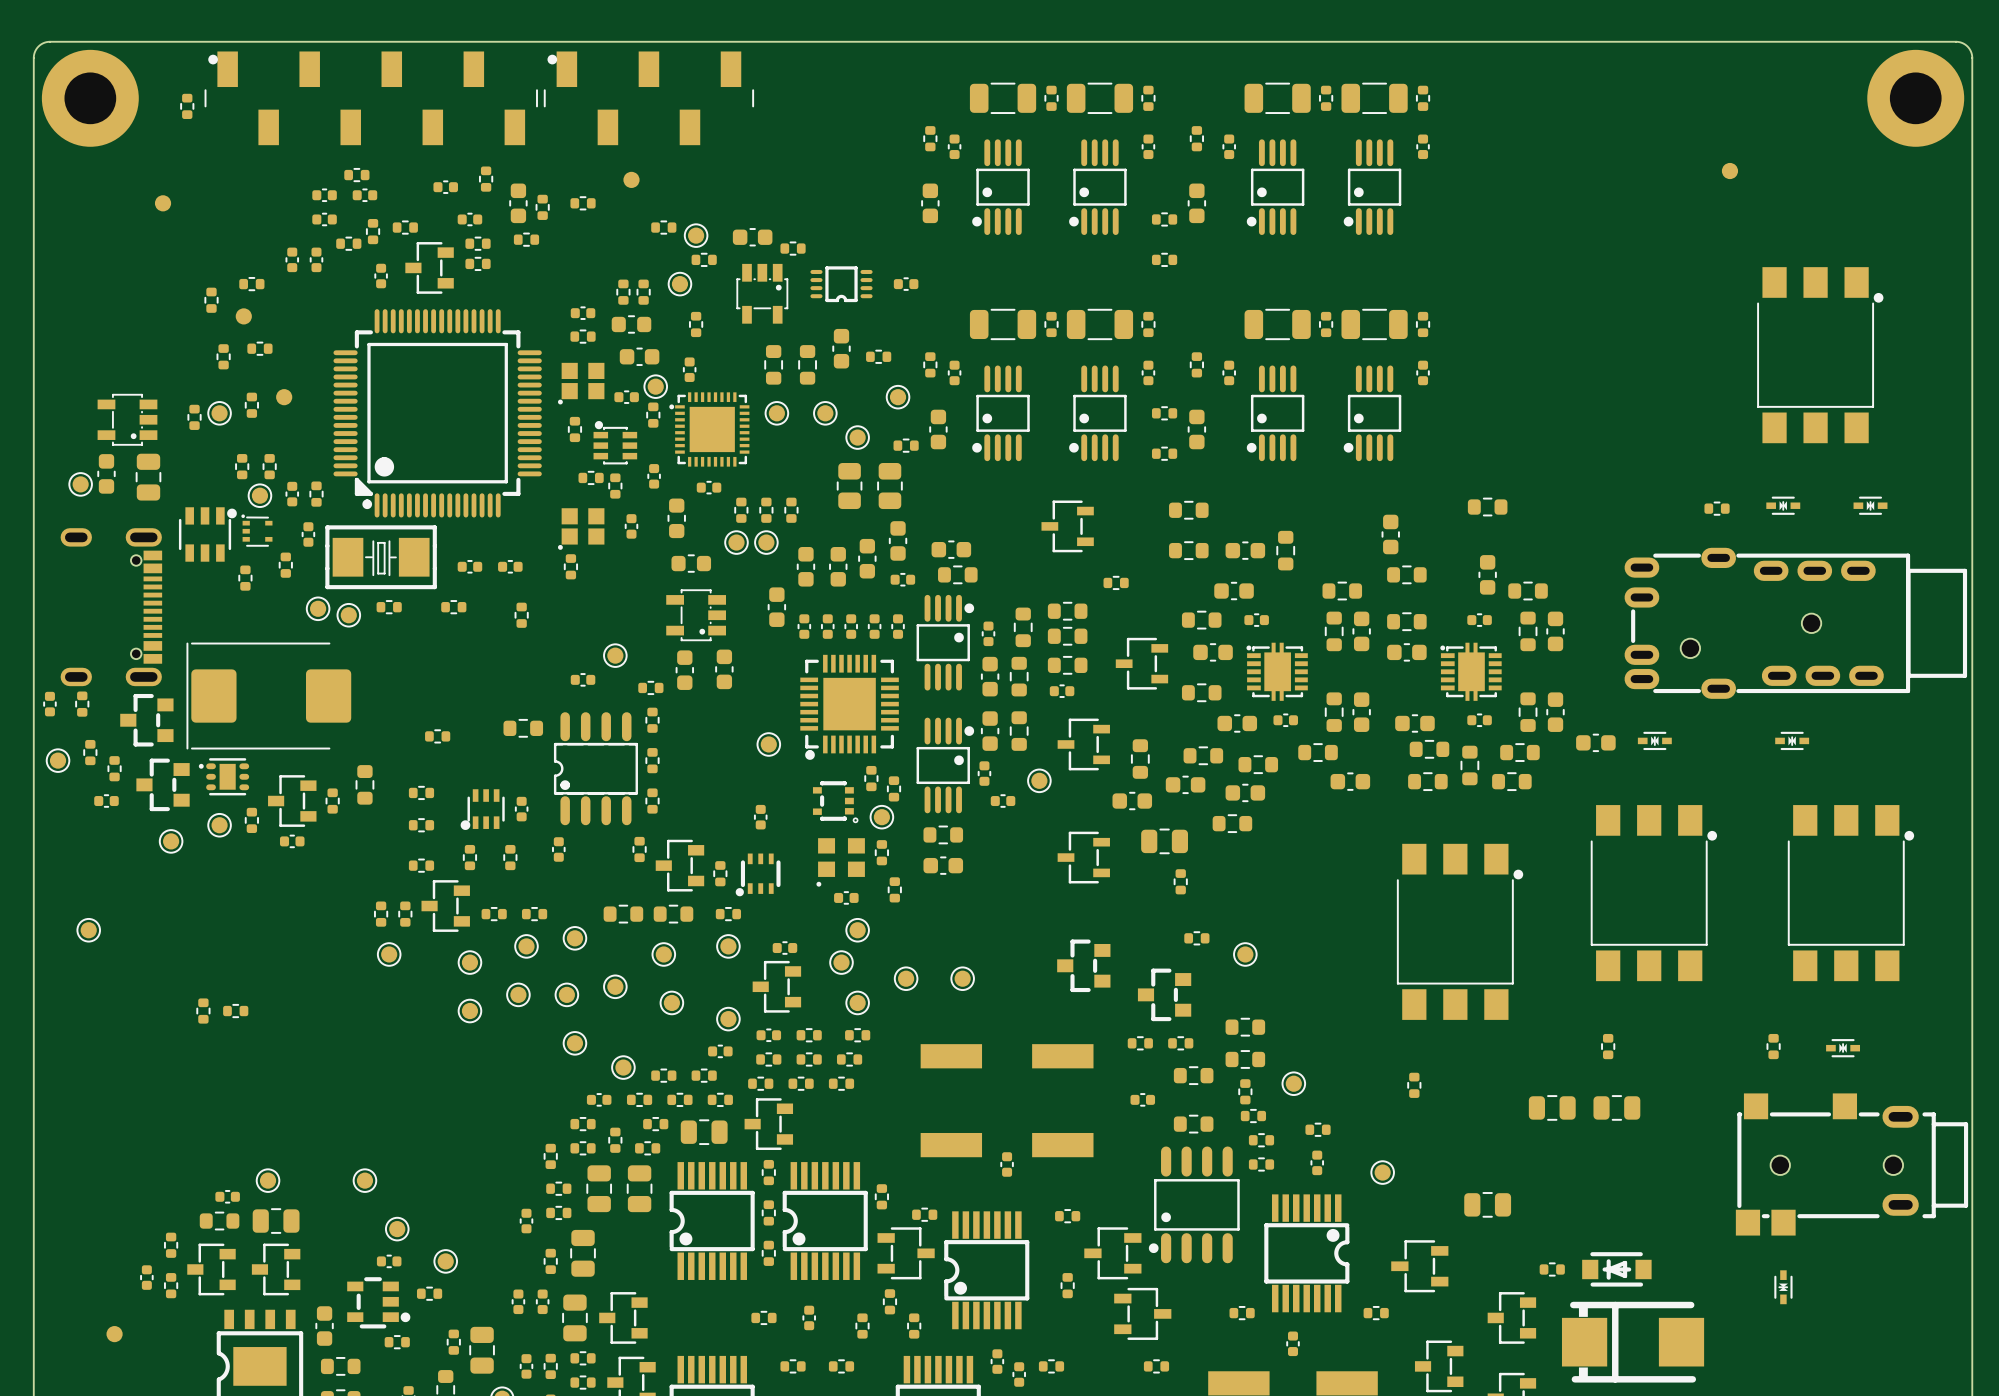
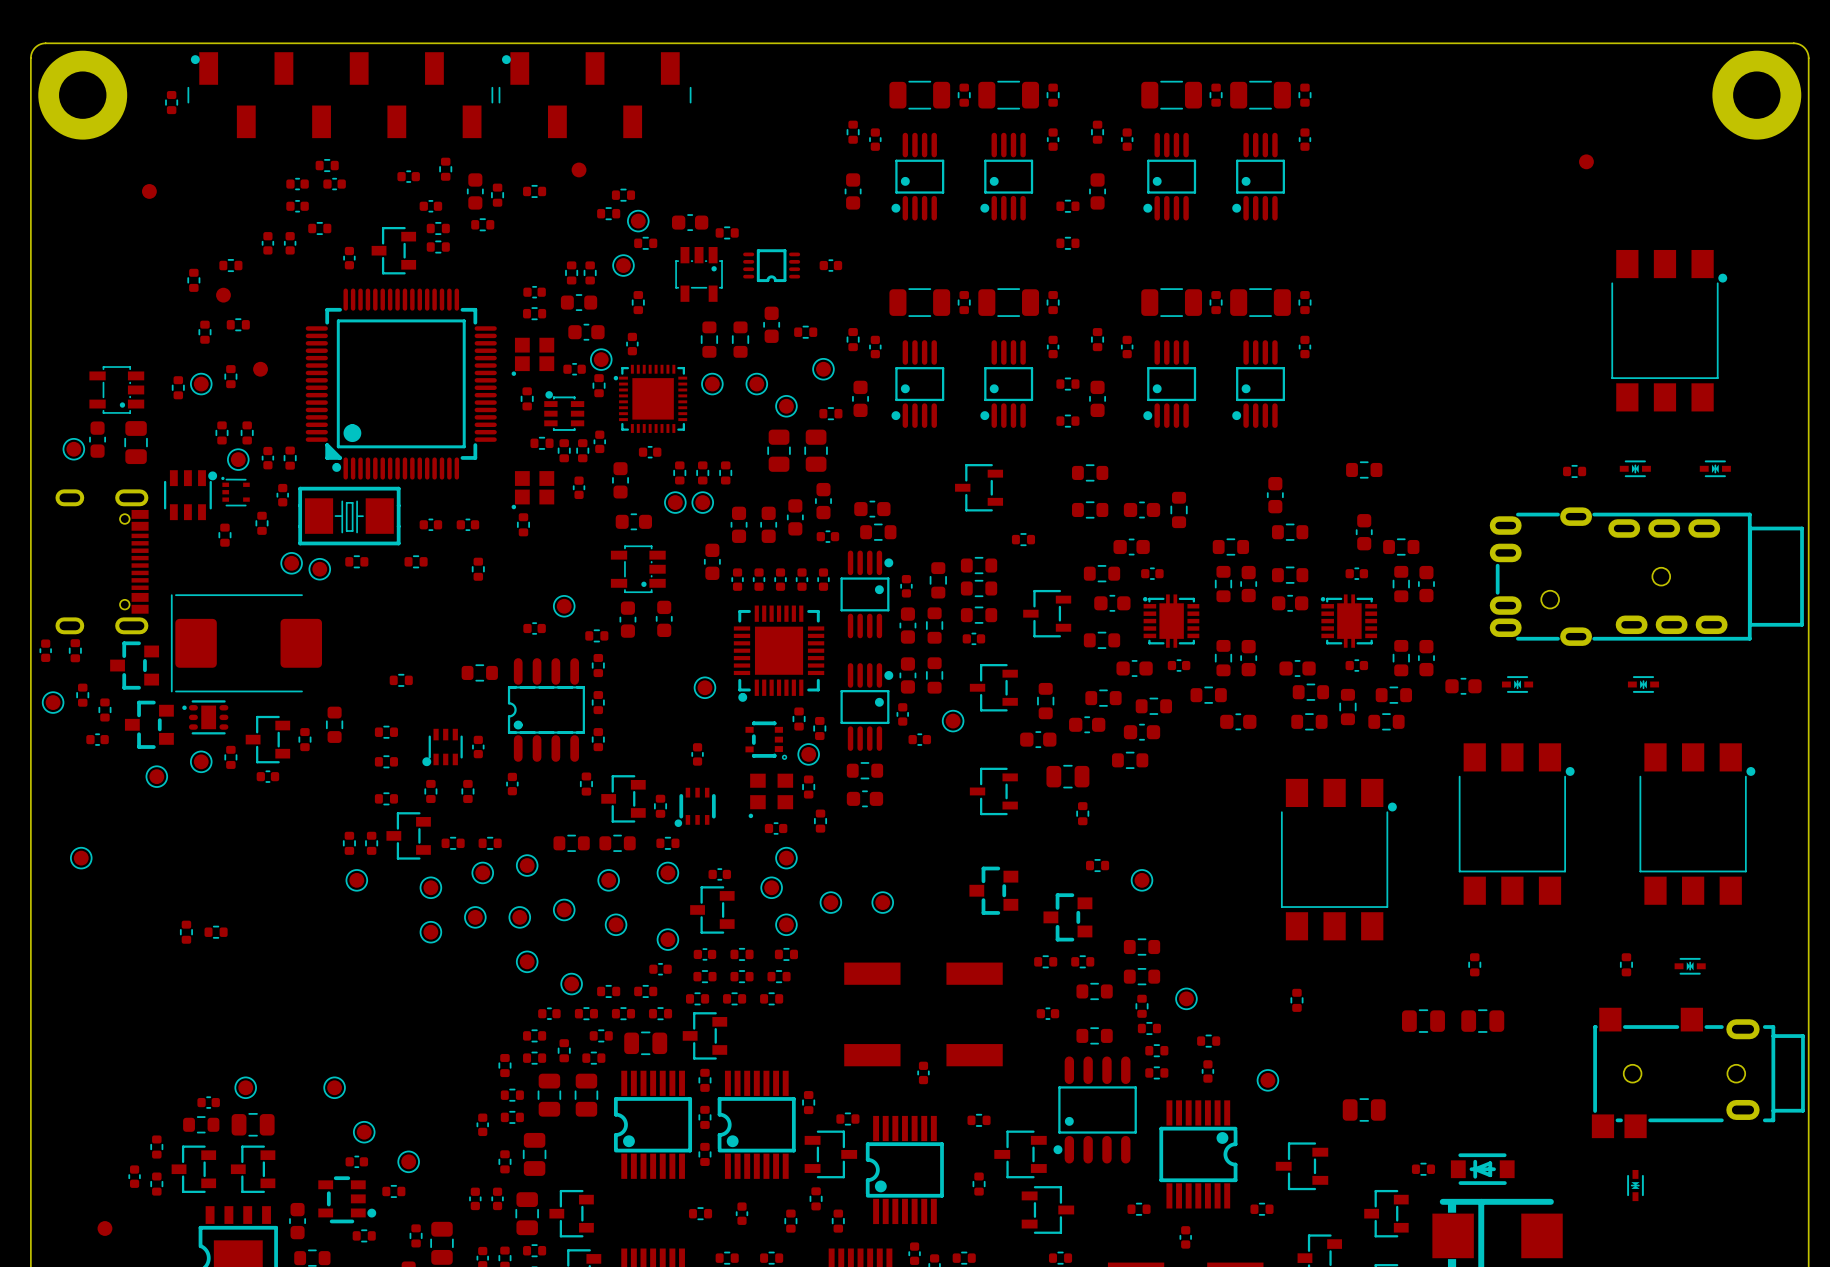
part: none -> (623, 195)
part: (405, 227) -> none
part: (373, 231) -> none
part: none -> (582, 450)

